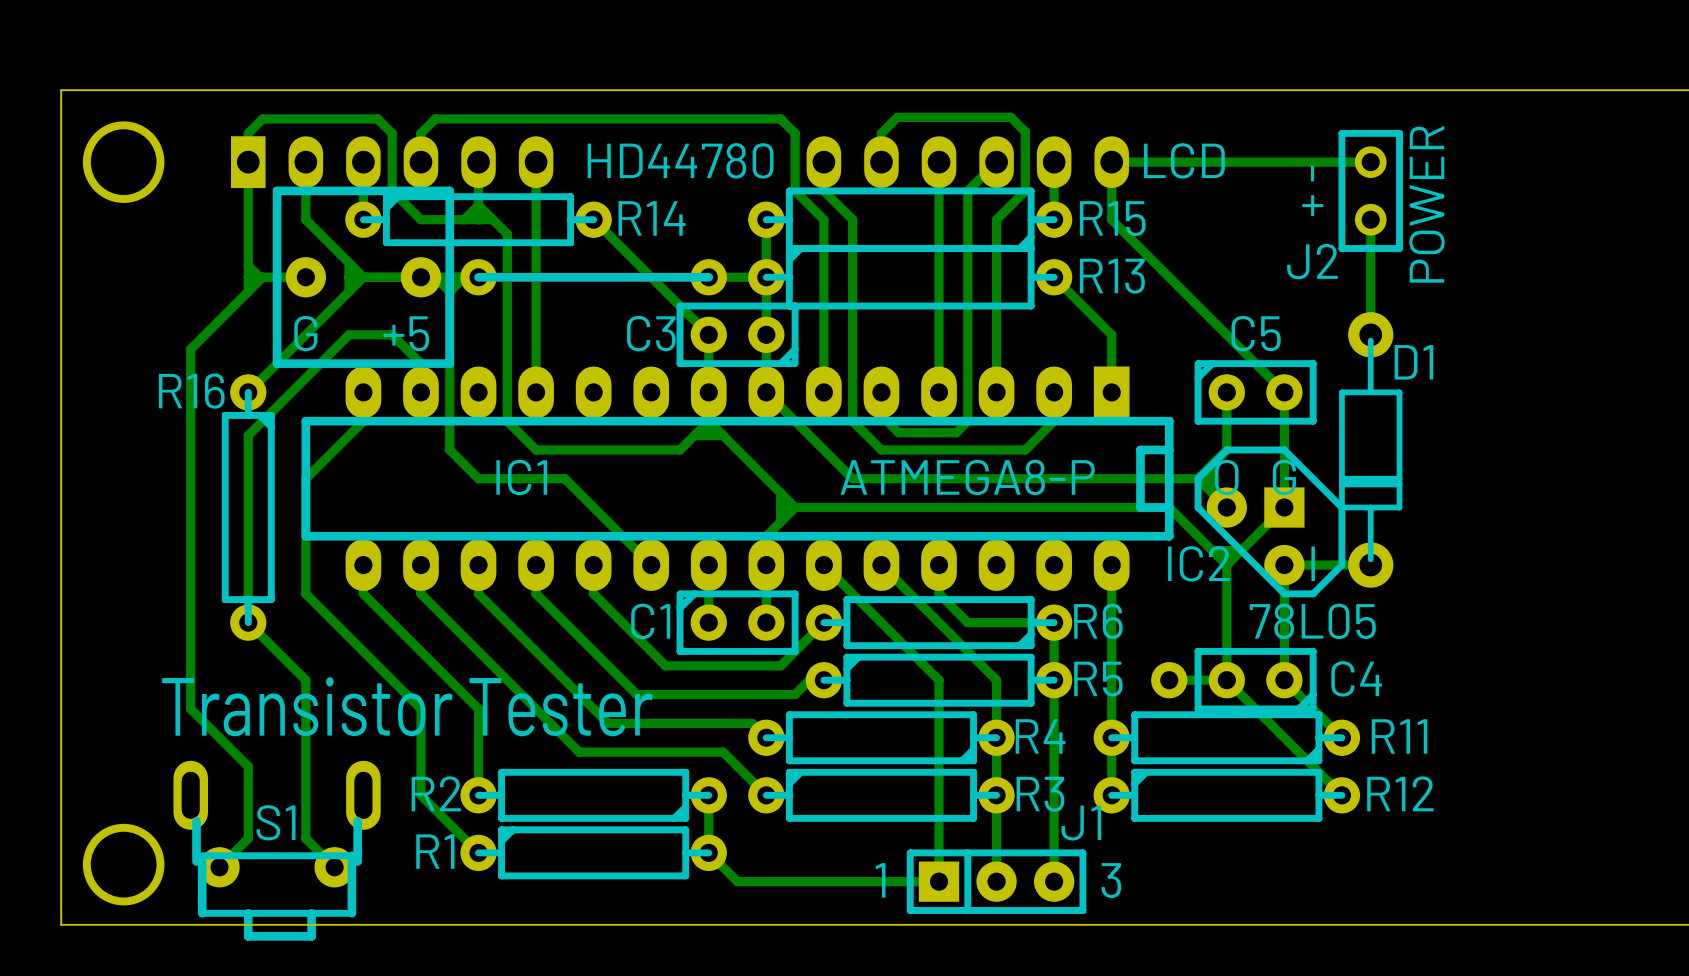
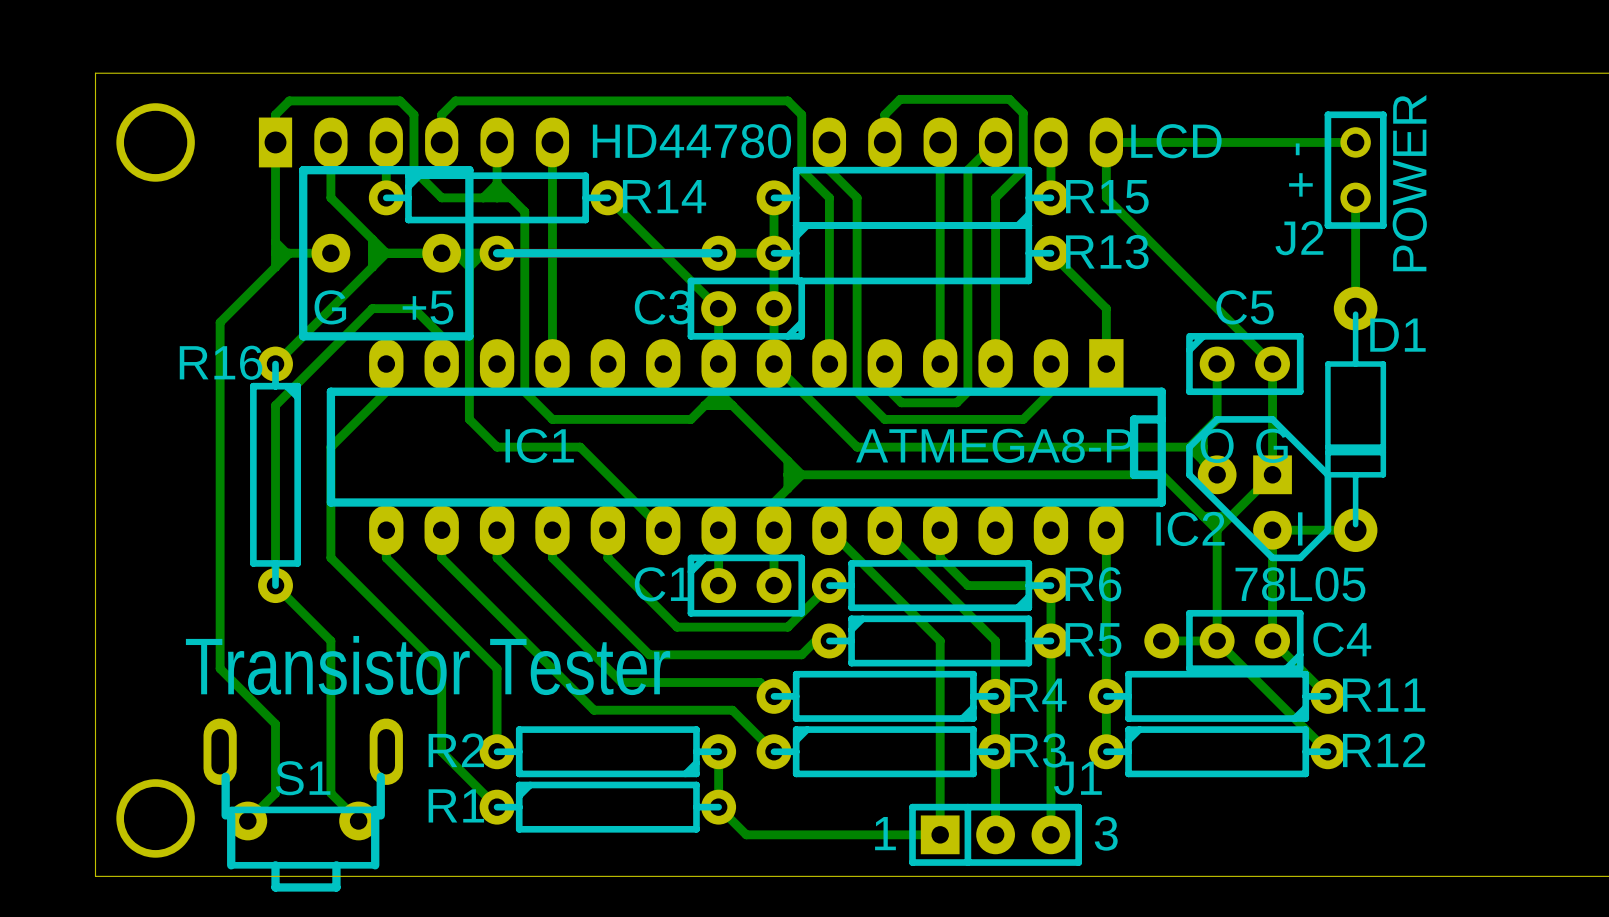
IC1 value position: ATMEGA8-P (967, 477) -> ATMEGA8-P (994, 445)

